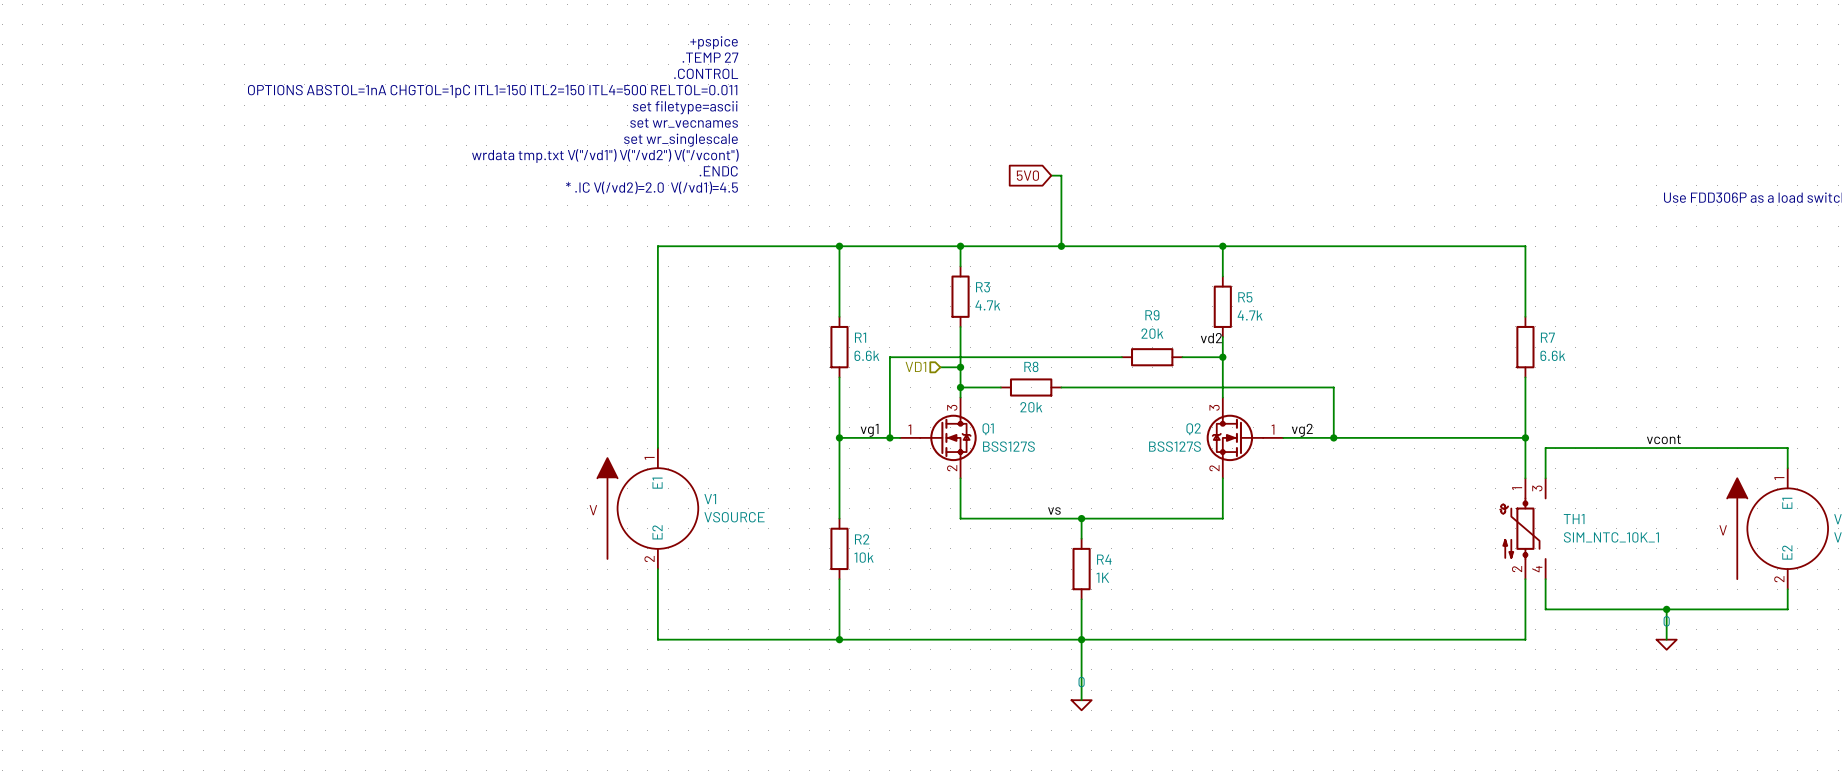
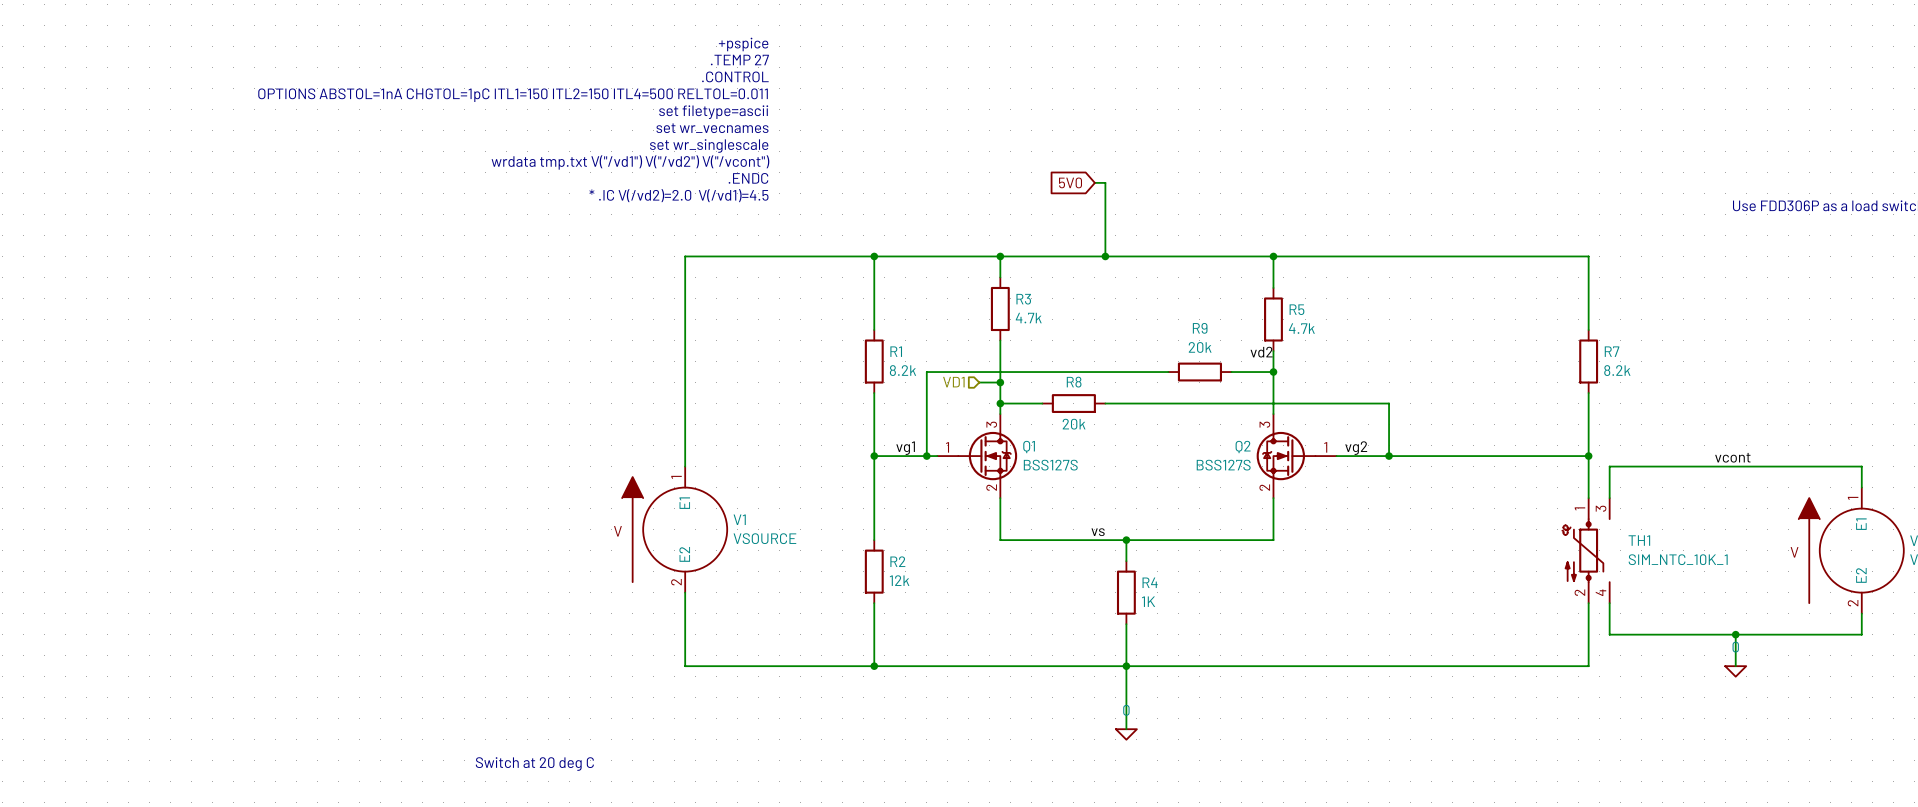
R1 value: 6.6k (866, 355) -> 8.2k (902, 370)
R7 value: 6.6k (1552, 355) -> 8.2k (1617, 370)
R2 value: 10k (864, 557) -> 12k (899, 580)
text: none -> Switch at 20 deg C (534, 764)

